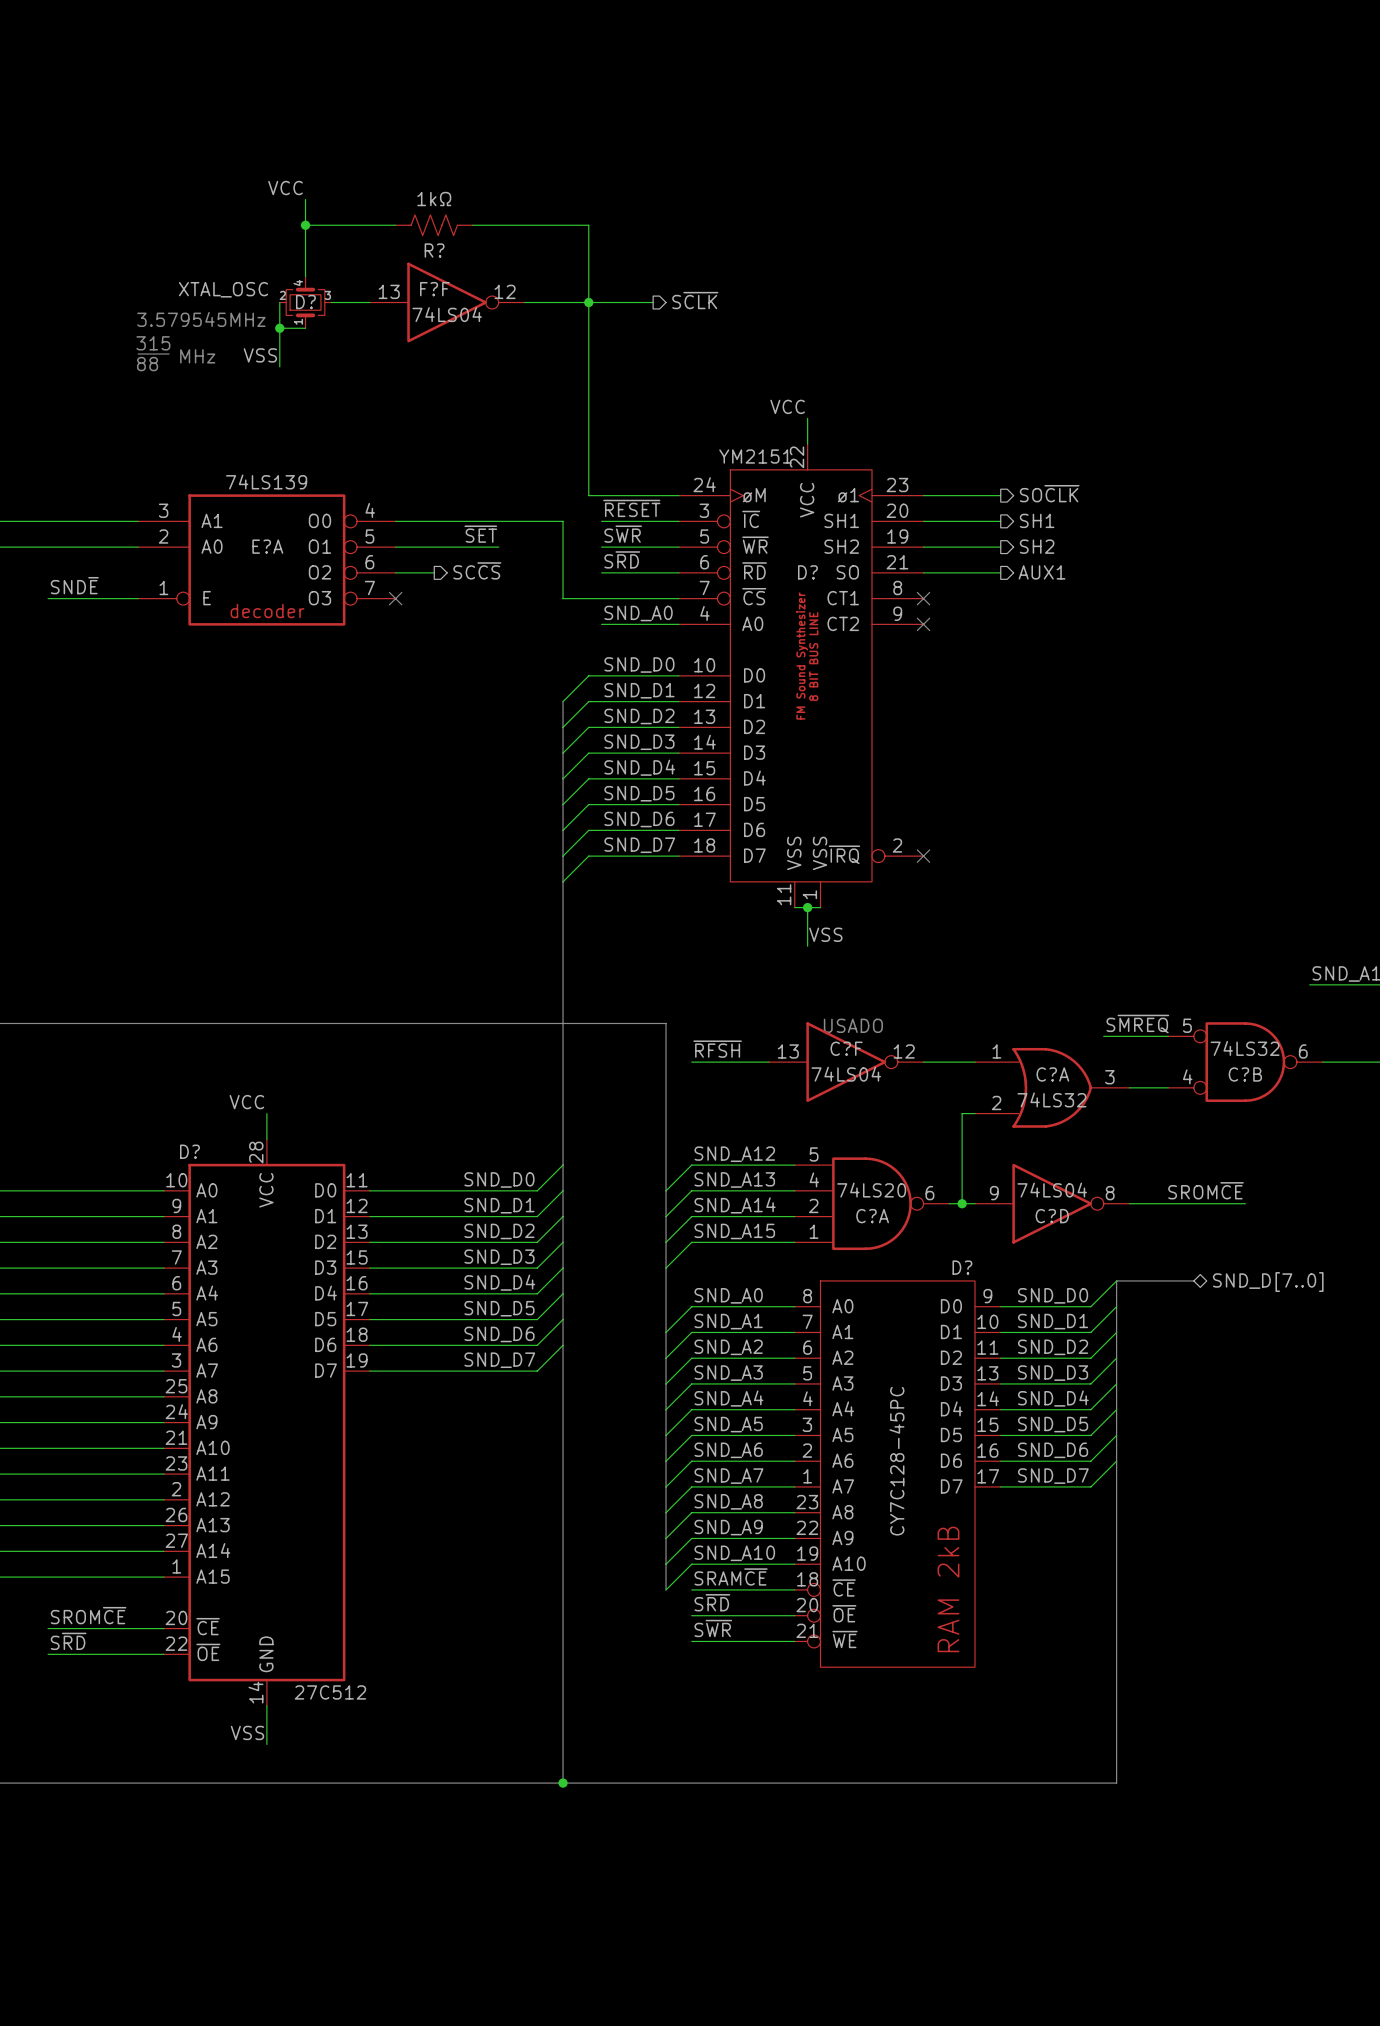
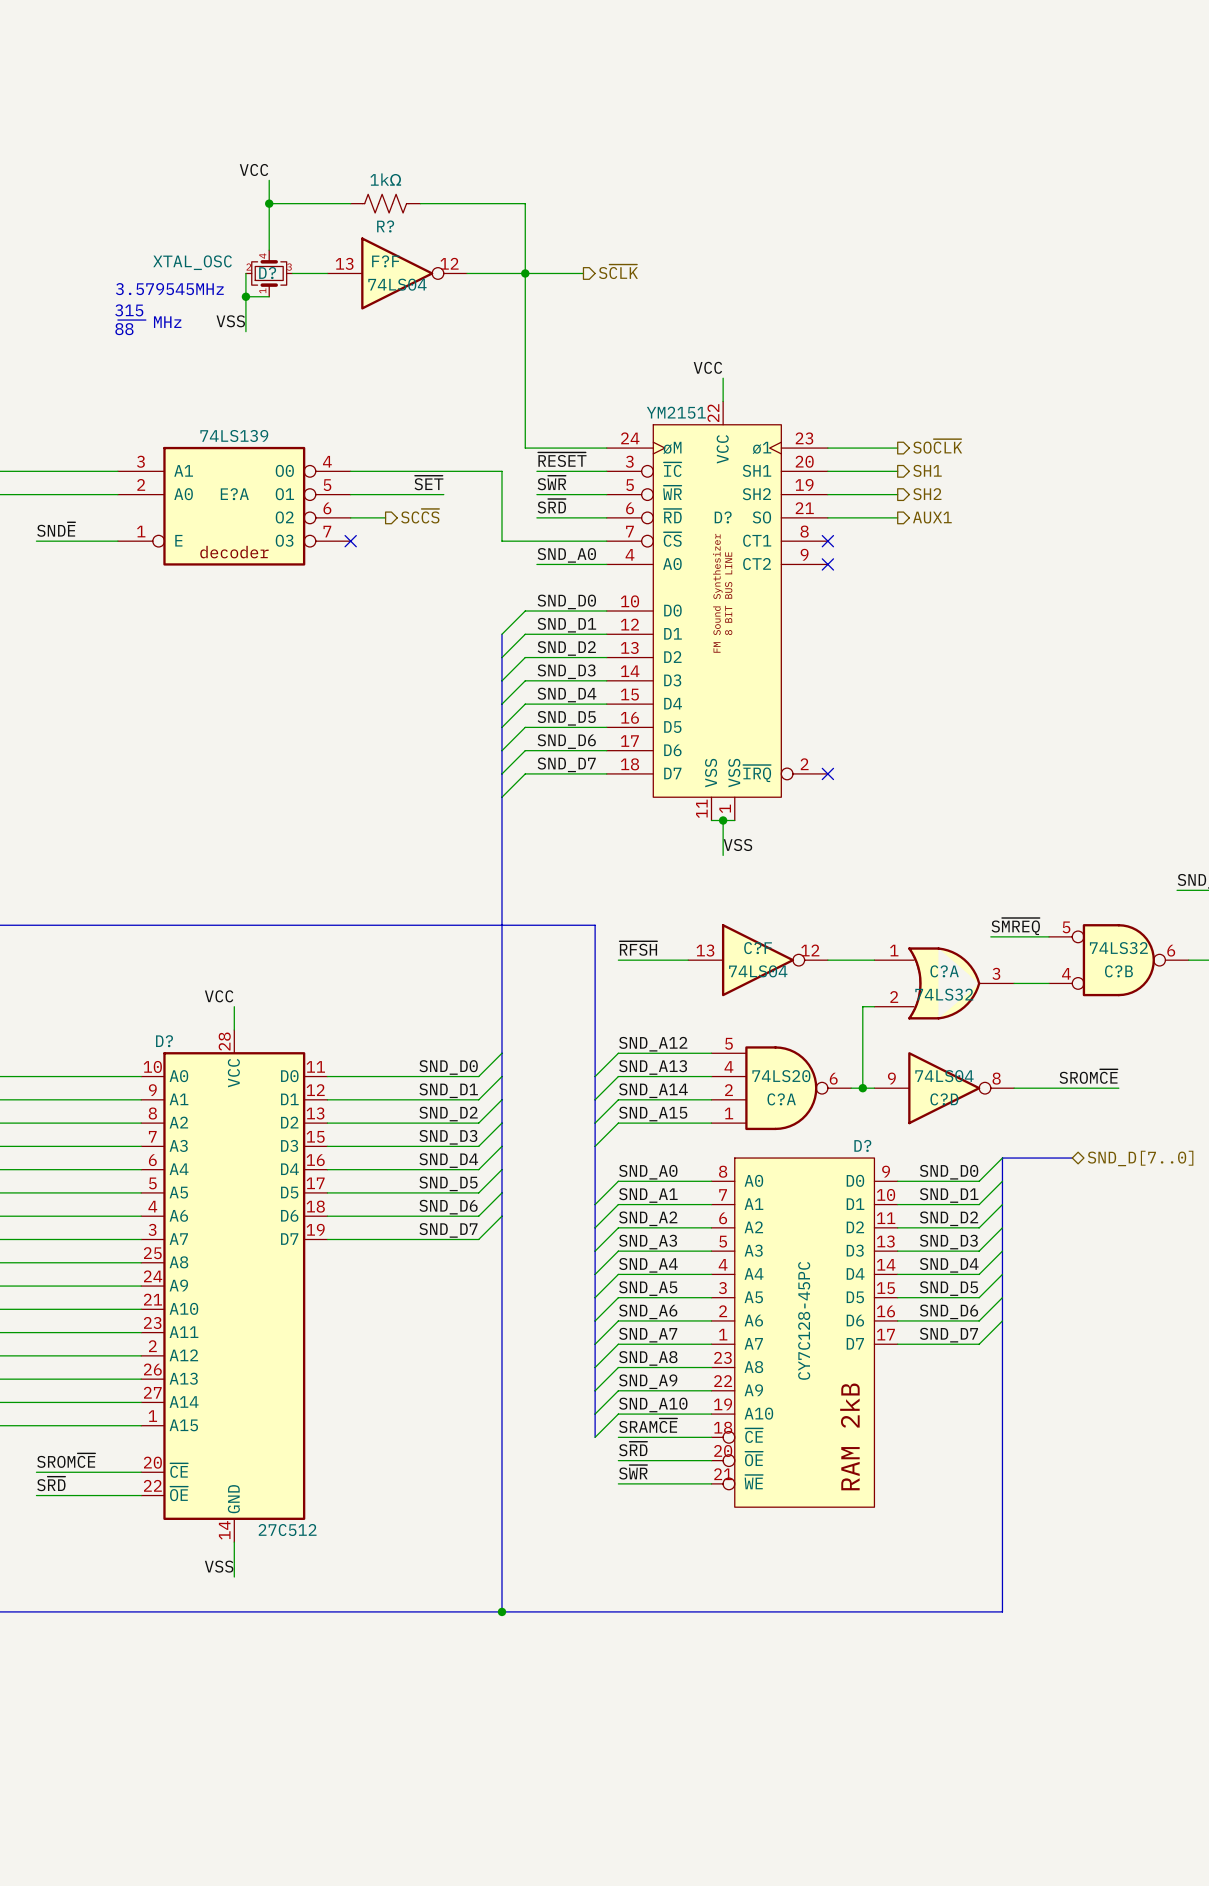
text: USADO (853, 1025) -> none

